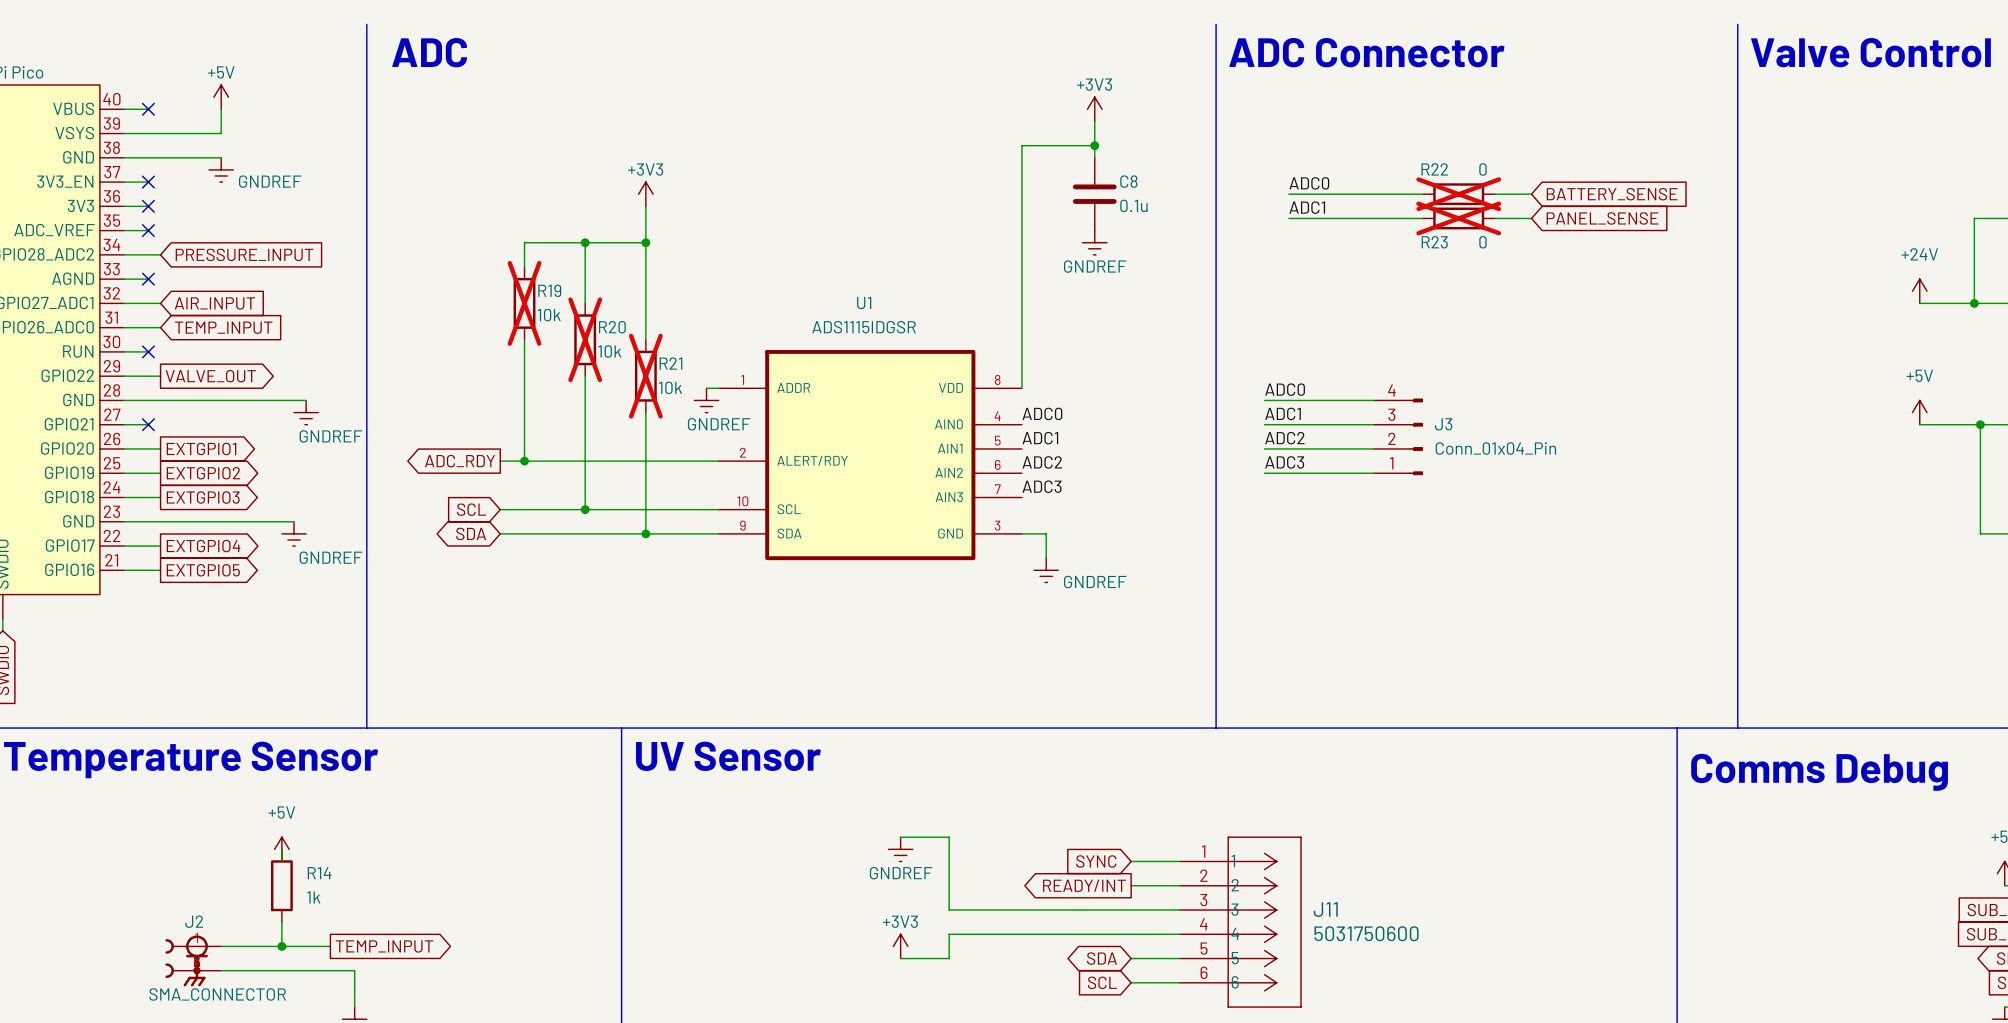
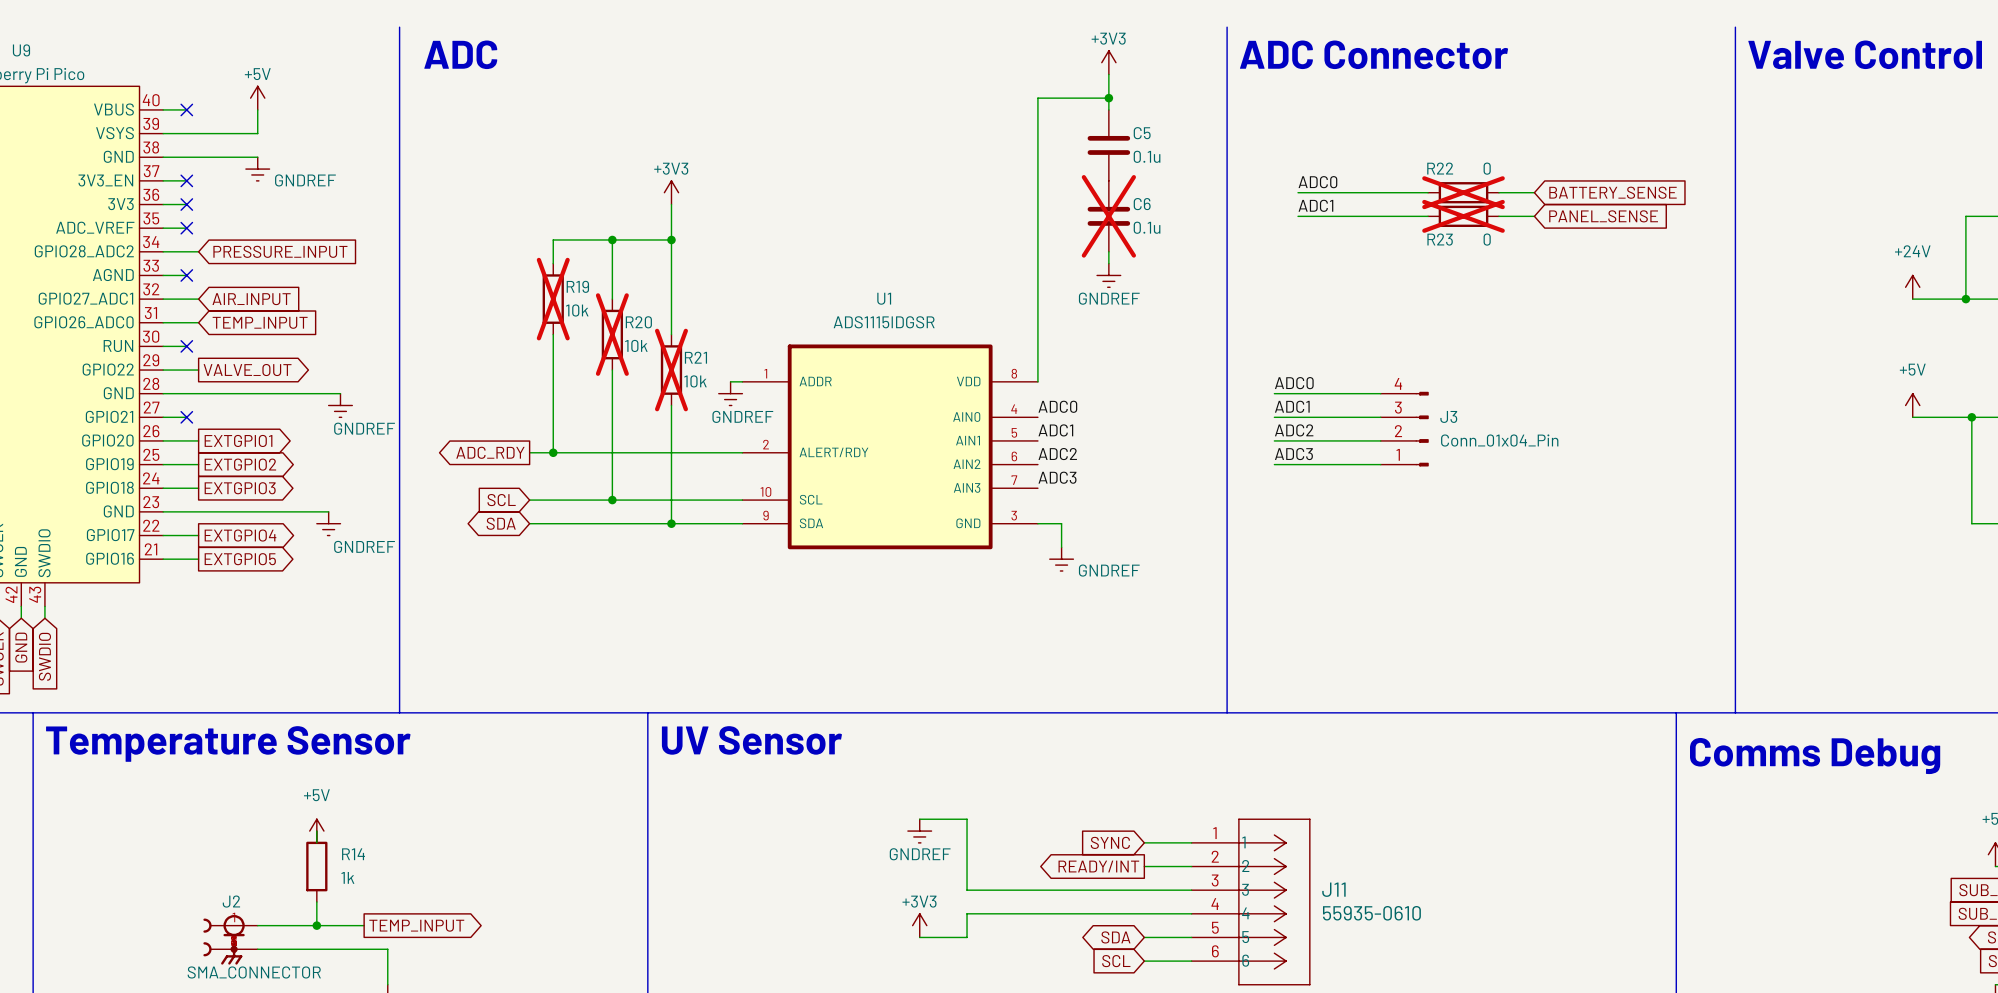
power symbol position: +3V3 (1094, 109) -> +3V3 (1108, 62)
wire: (1021, 145) (1094, 145) -> (1037, 145) (1037, 98) (1108, 98)
junction position: (1094, 145) -> (1108, 98)
C5: none -> 0.1u (1108, 145)
C8: 0.1u (1094, 194) -> none
C6: none -> 0.1u (1108, 216)
power symbol position: GNDREF (1094, 242) -> GNDREF (1108, 275)
wire: none -> (1108, 251) (1108, 263)
J11 value: 5031750600 (1366, 933) -> 55935-0610 (1371, 913)

